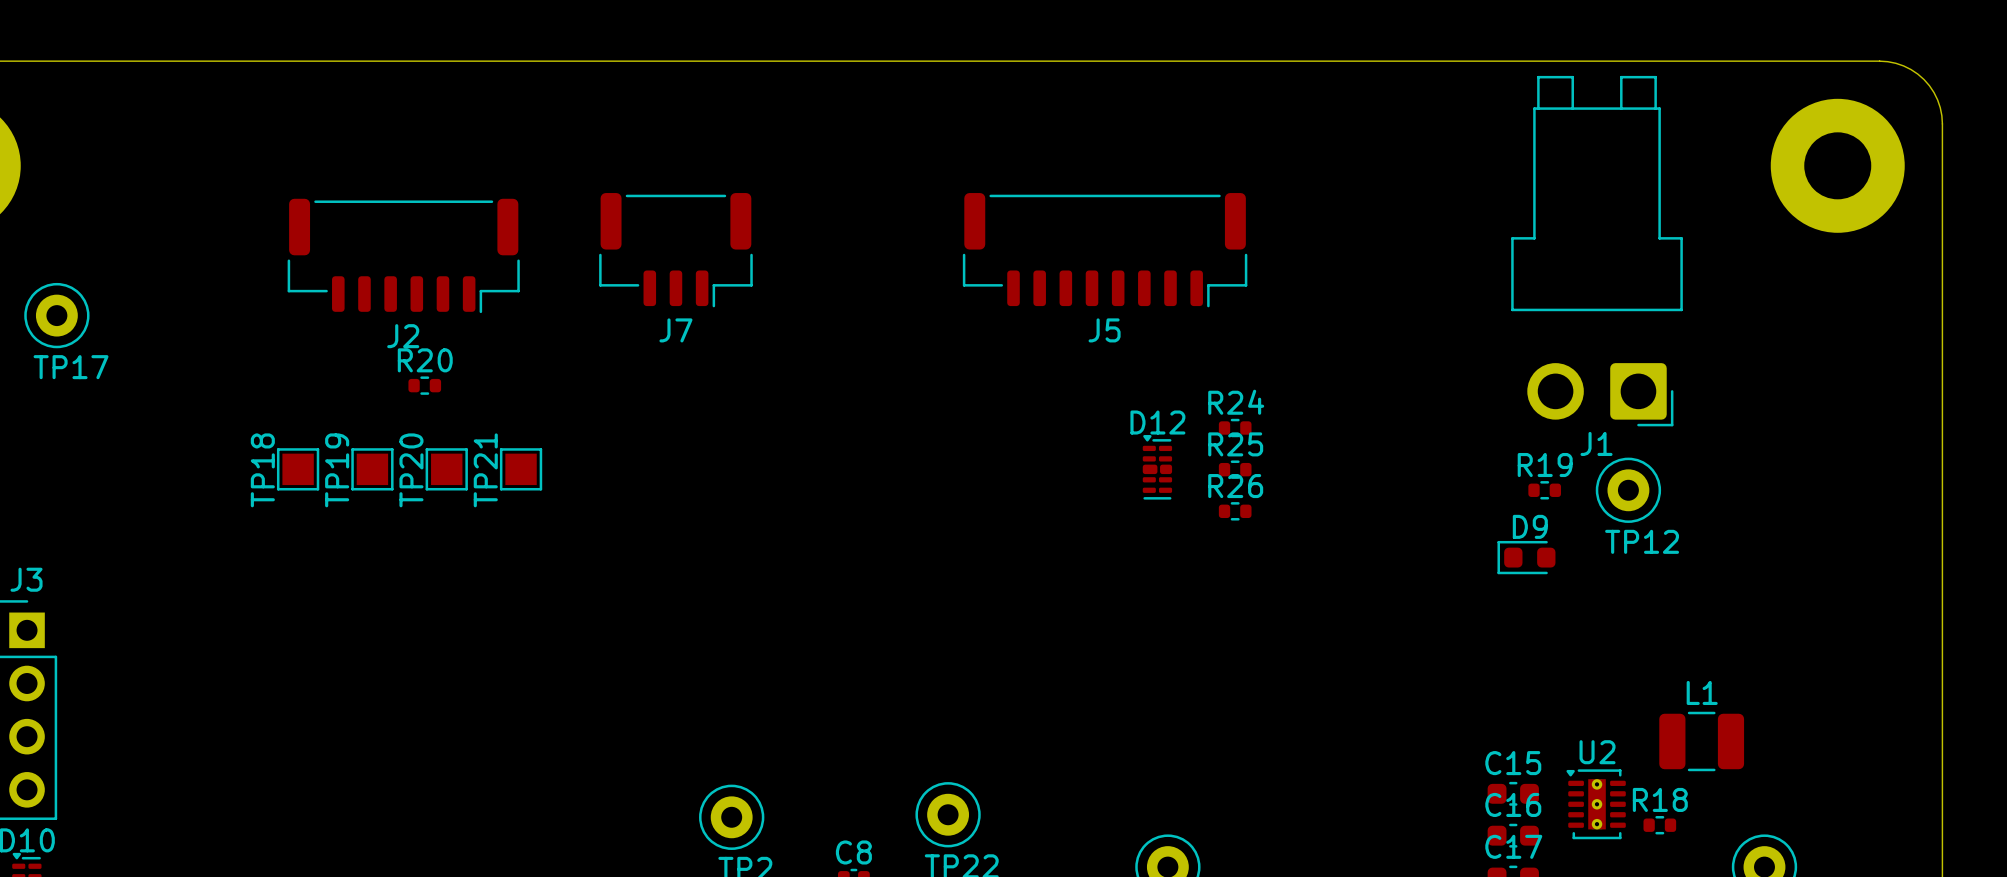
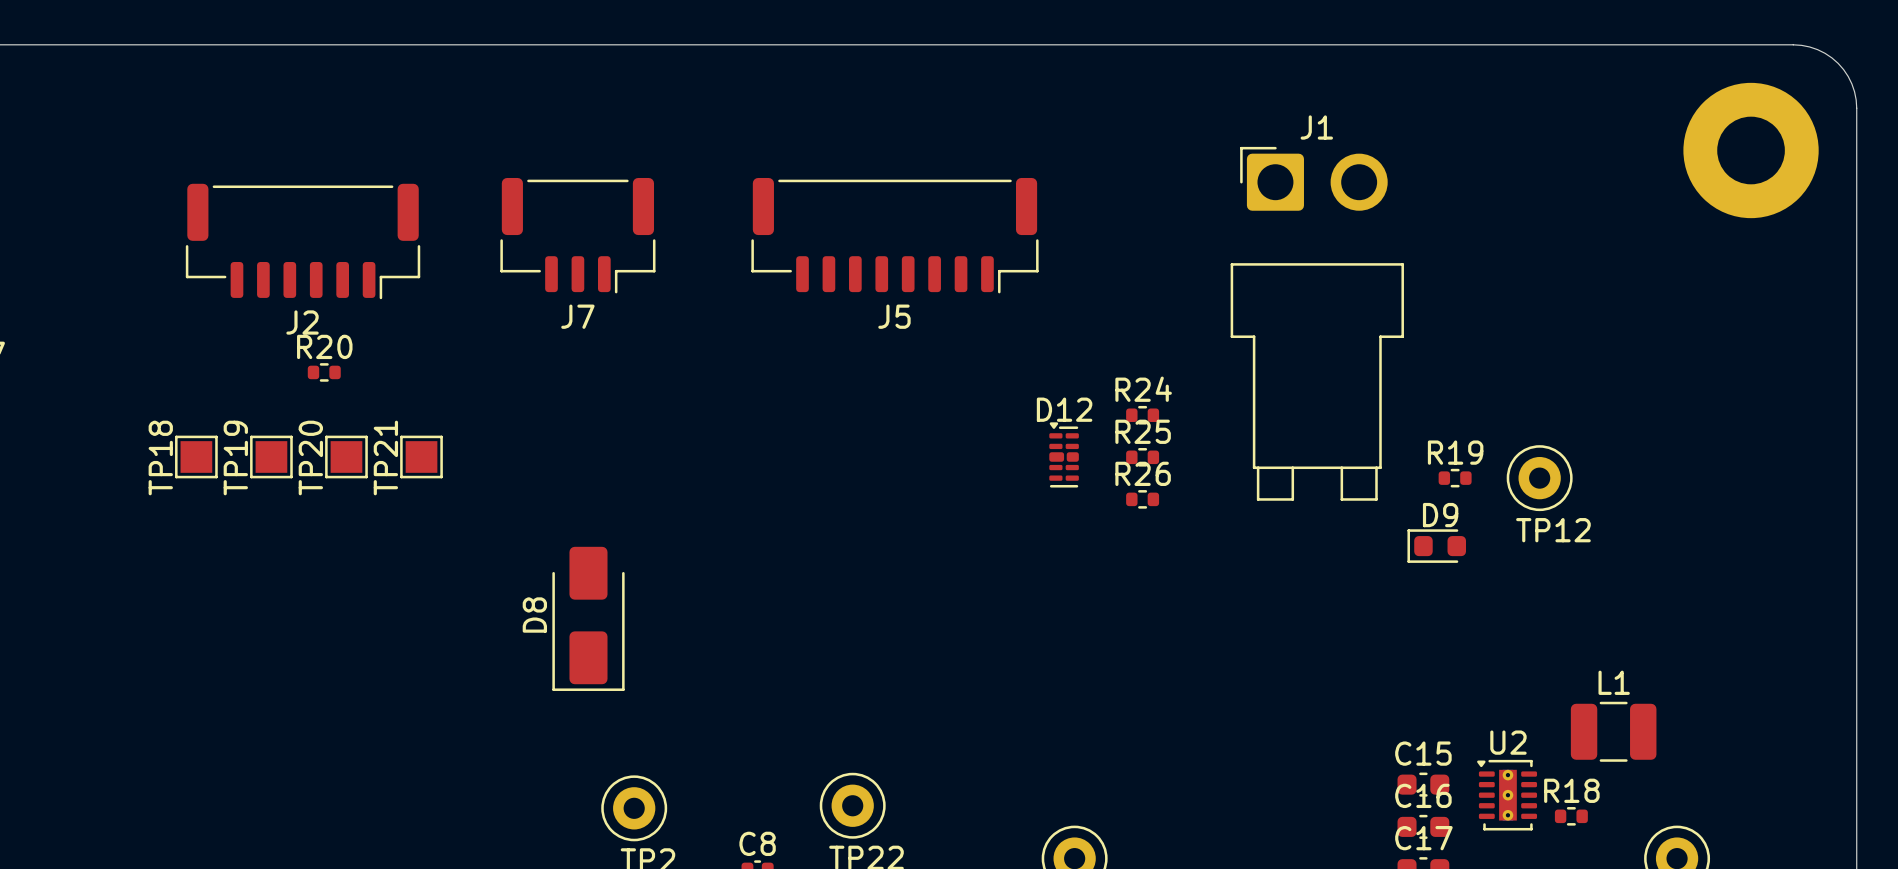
J5 position: (1105, 250) -> (894, 235)
J1 rotation: 0° (1597, 251) -> 180° (1317, 323)
D8: none -> (588, 618)

